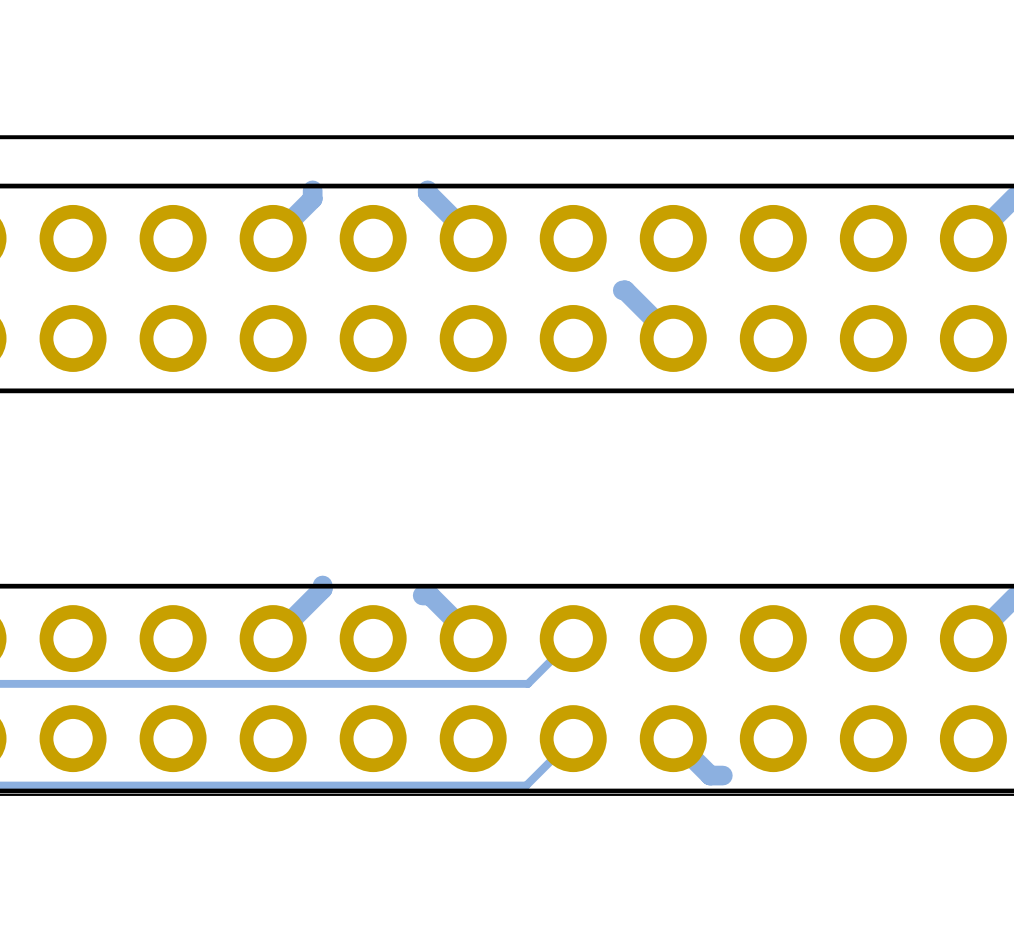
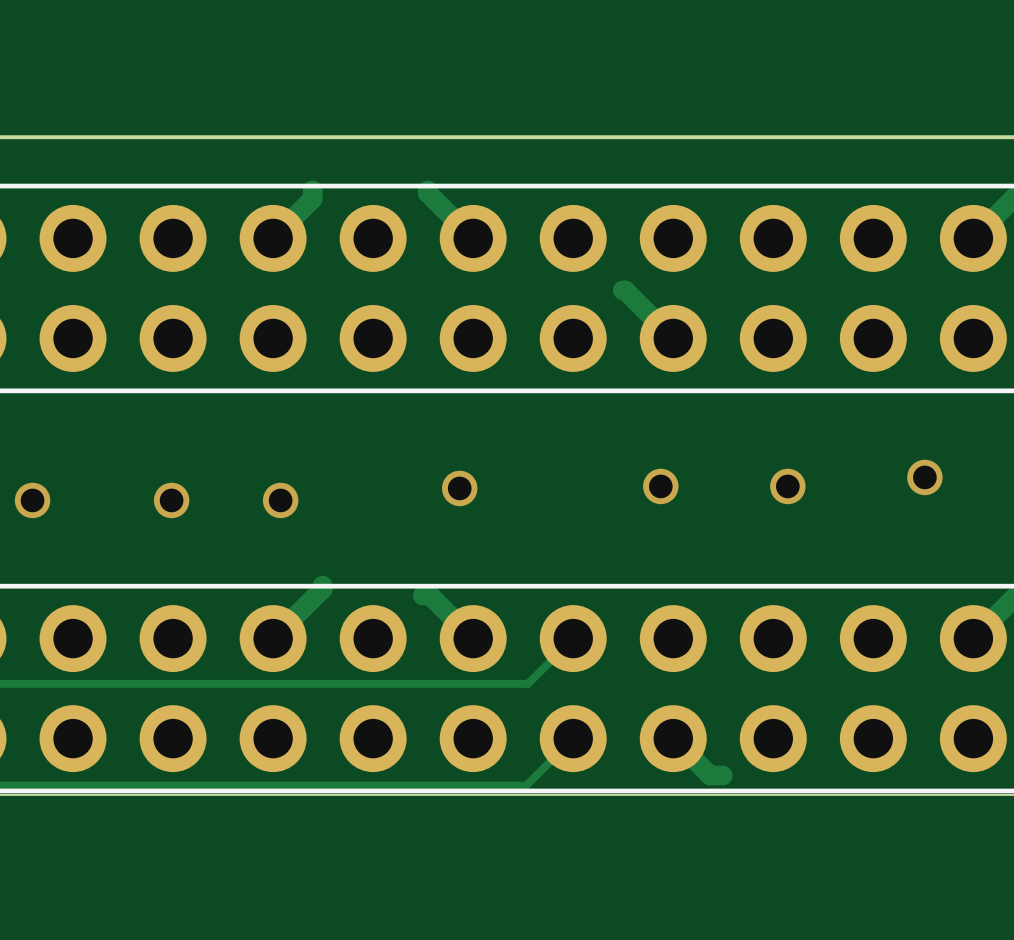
via: none -> (924, 477)
via: none -> (660, 486)
via: none -> (787, 486)
via: none -> (459, 488)
via: none -> (32, 500)
via: none -> (171, 500)
via: none -> (280, 500)

